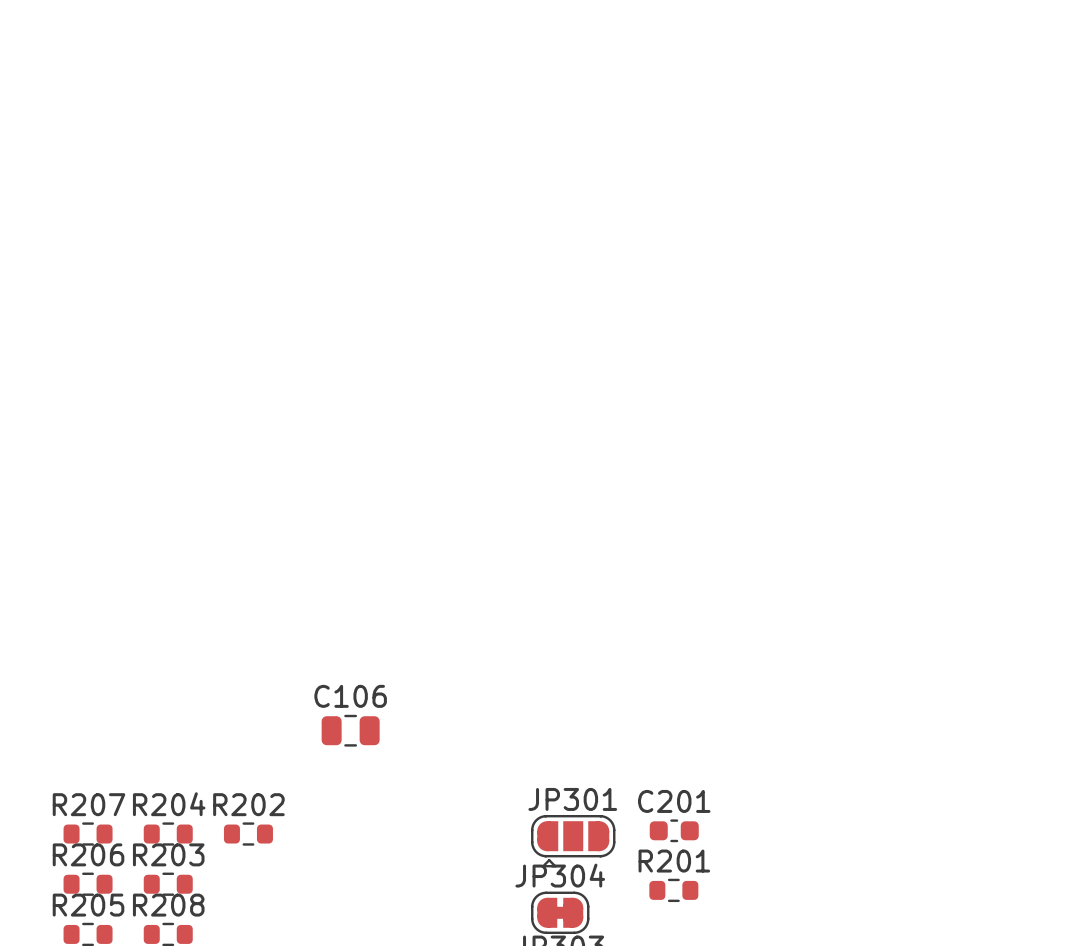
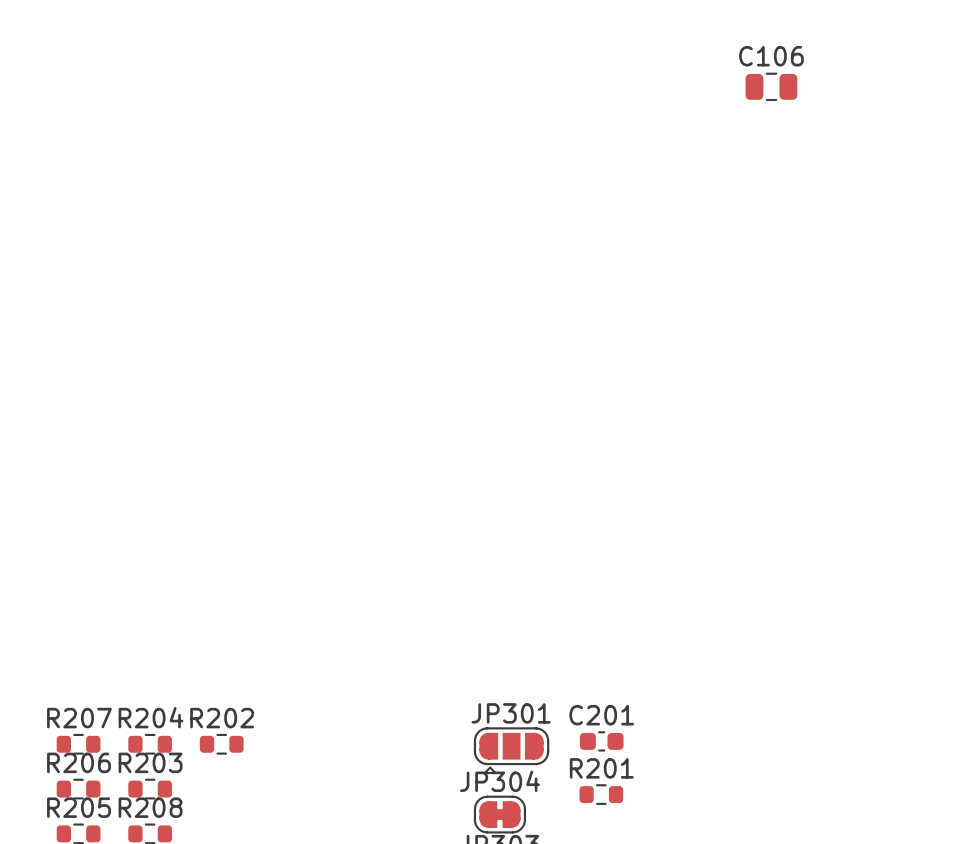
C106 position: (350, 730) -> (771, 86)

